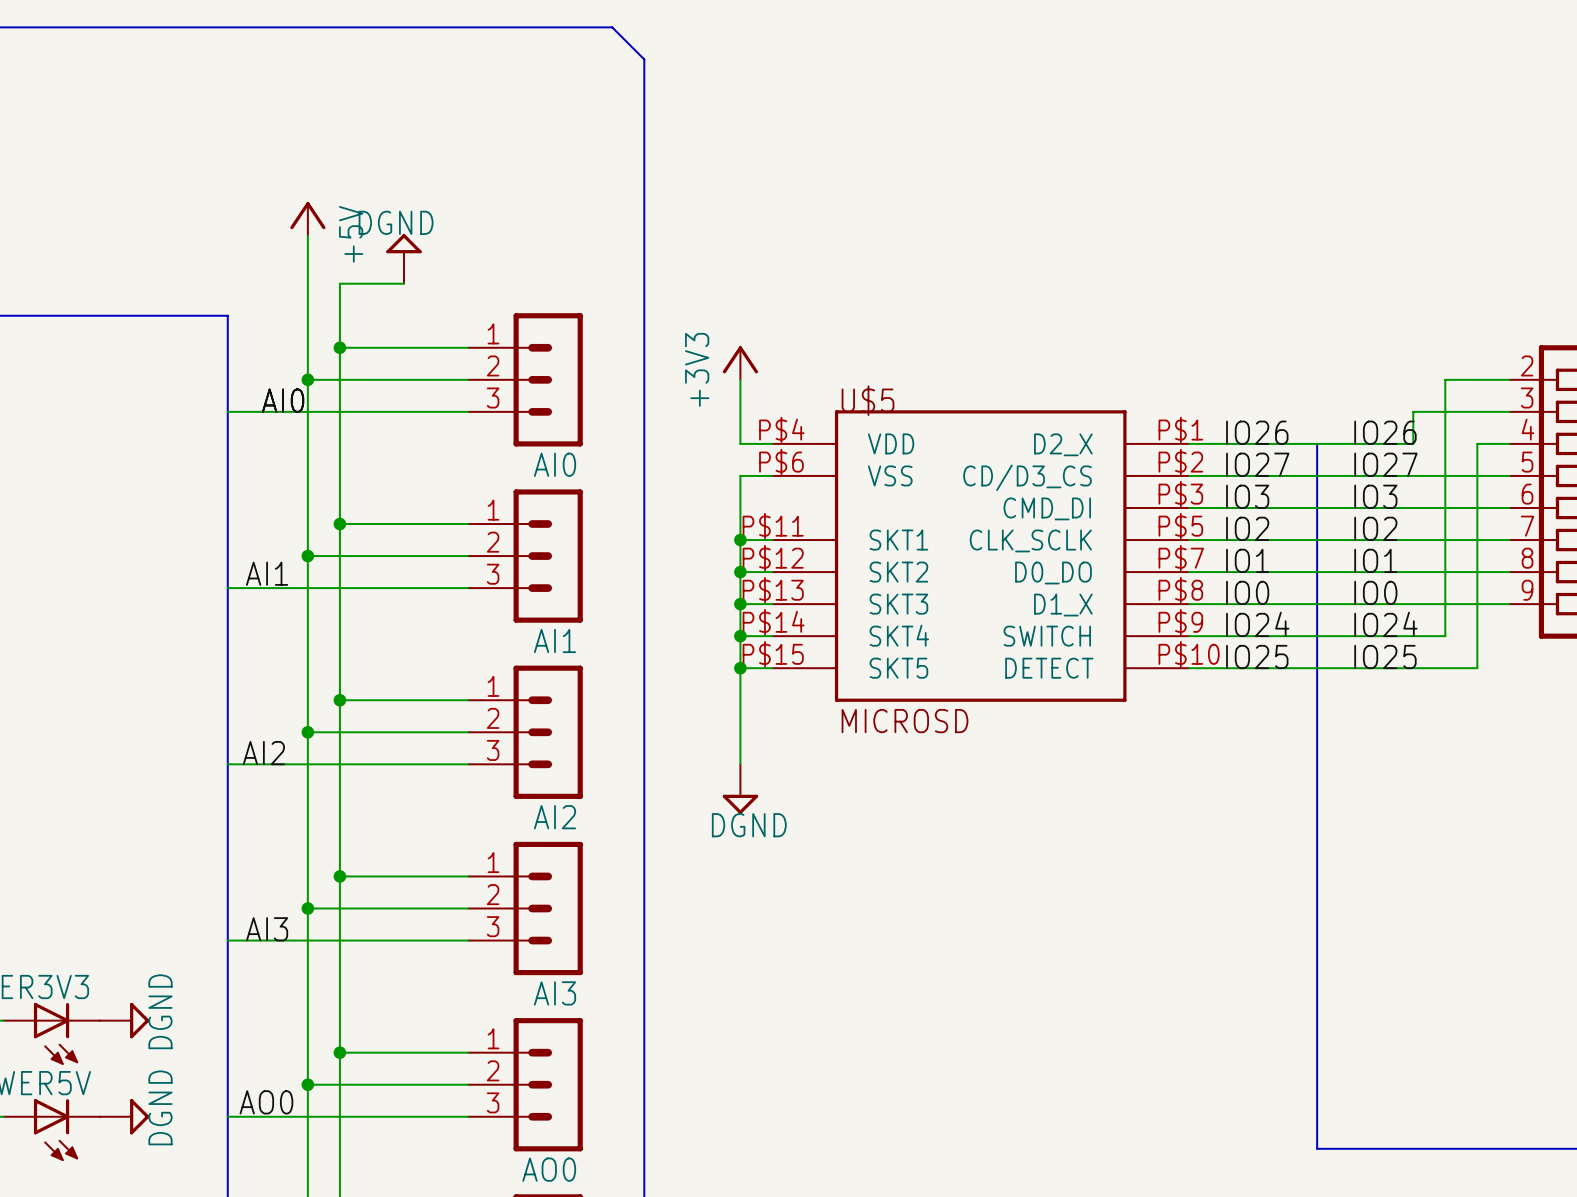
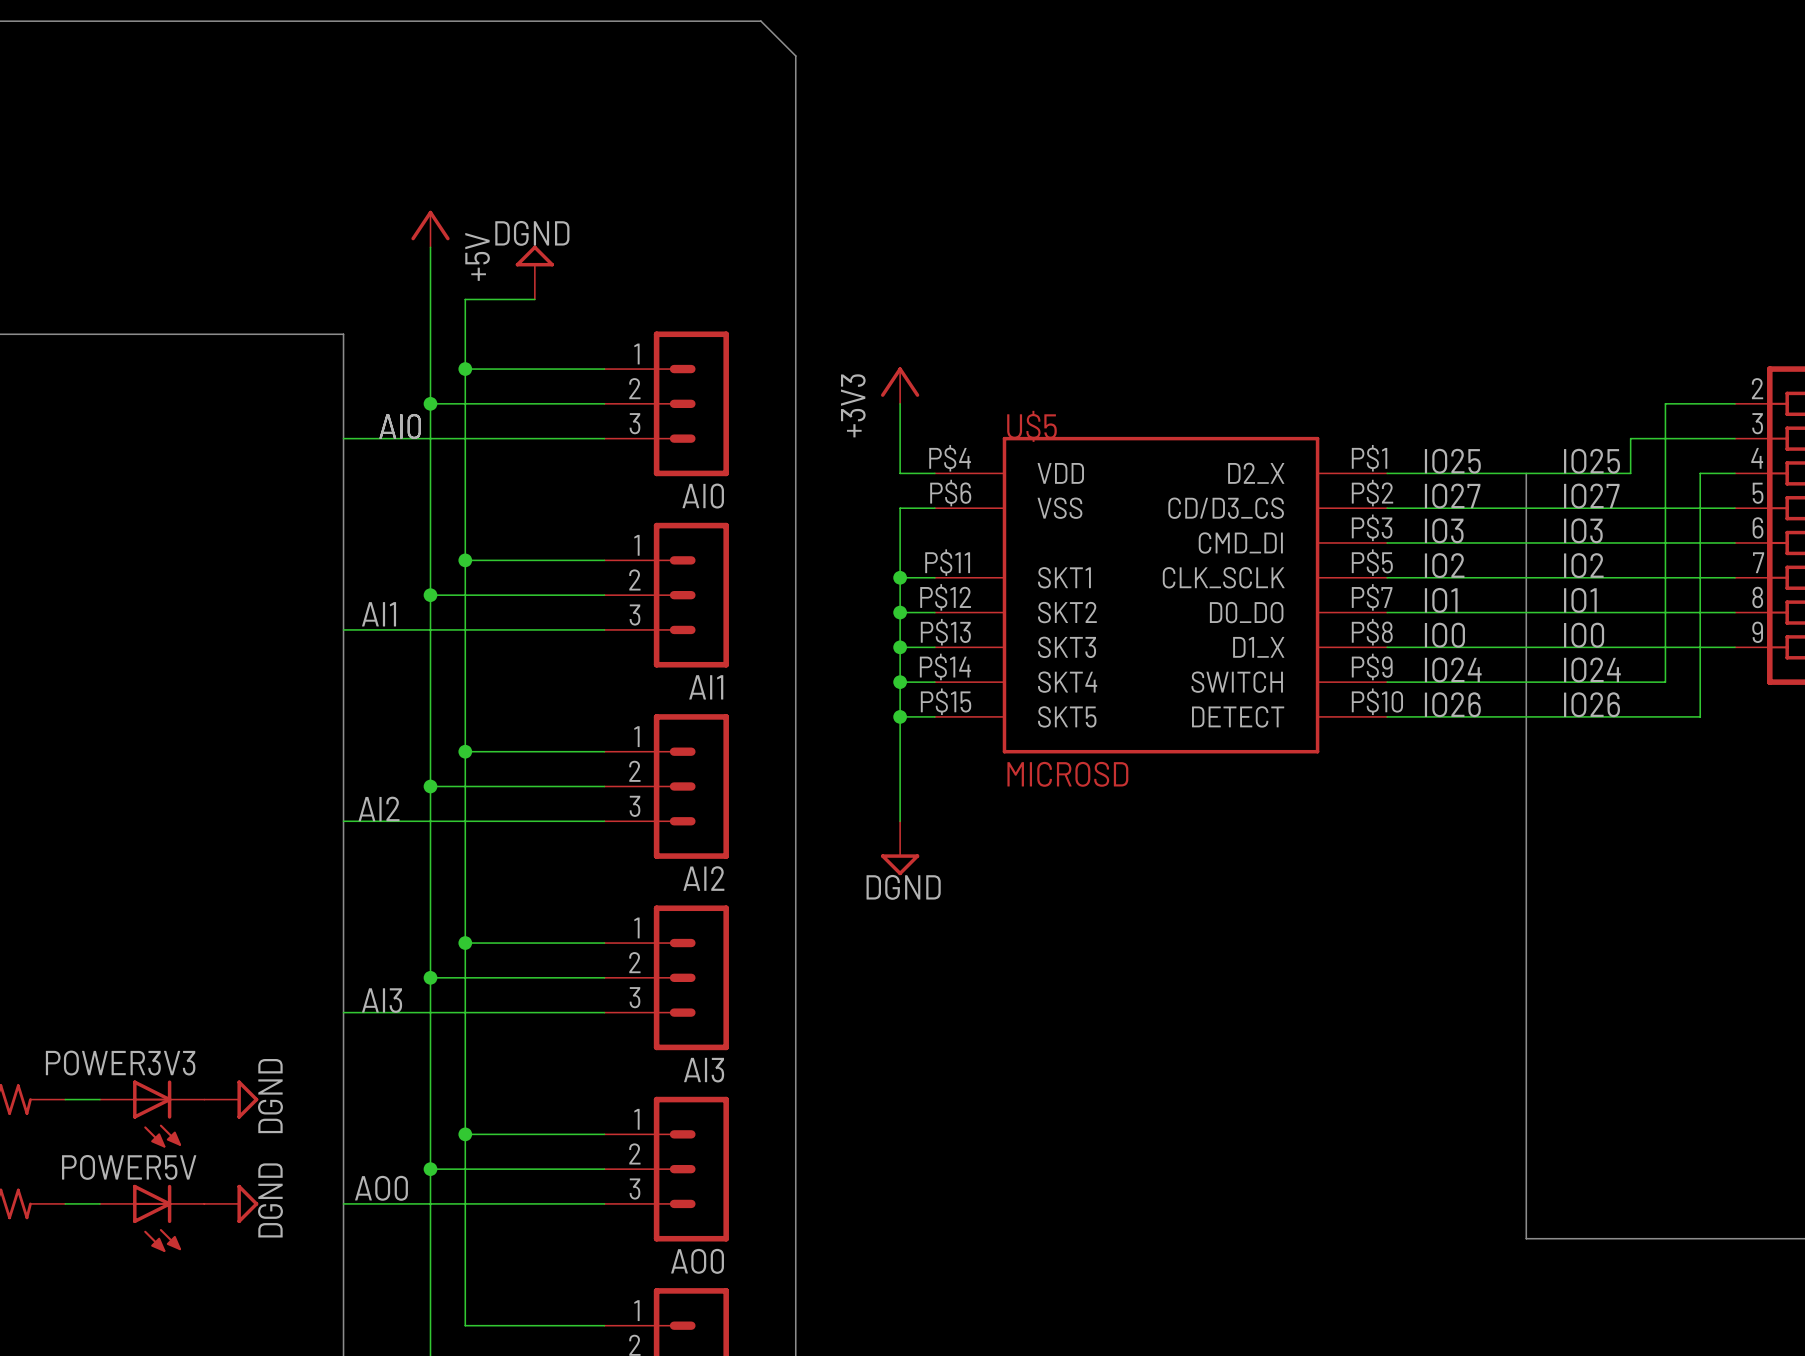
label: IO26 (1257, 432) -> IO25 (1452, 461)
label: IO26 (1385, 432) -> IO25 (1591, 461)
label: IO25 (1257, 656) -> IO26 (1452, 704)
label: IO25 (1385, 656) -> IO26 (1592, 704)

